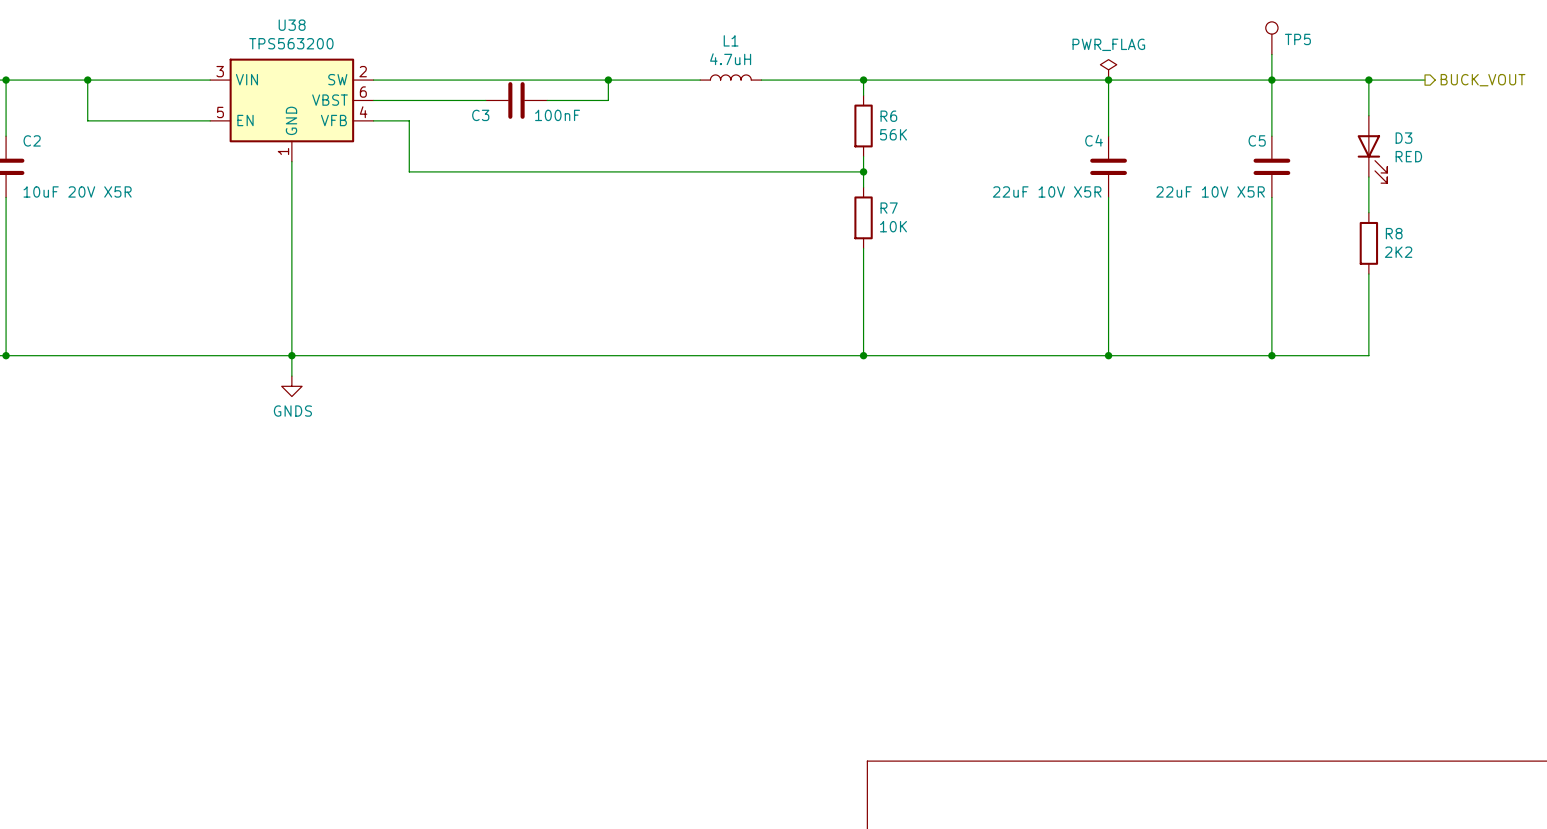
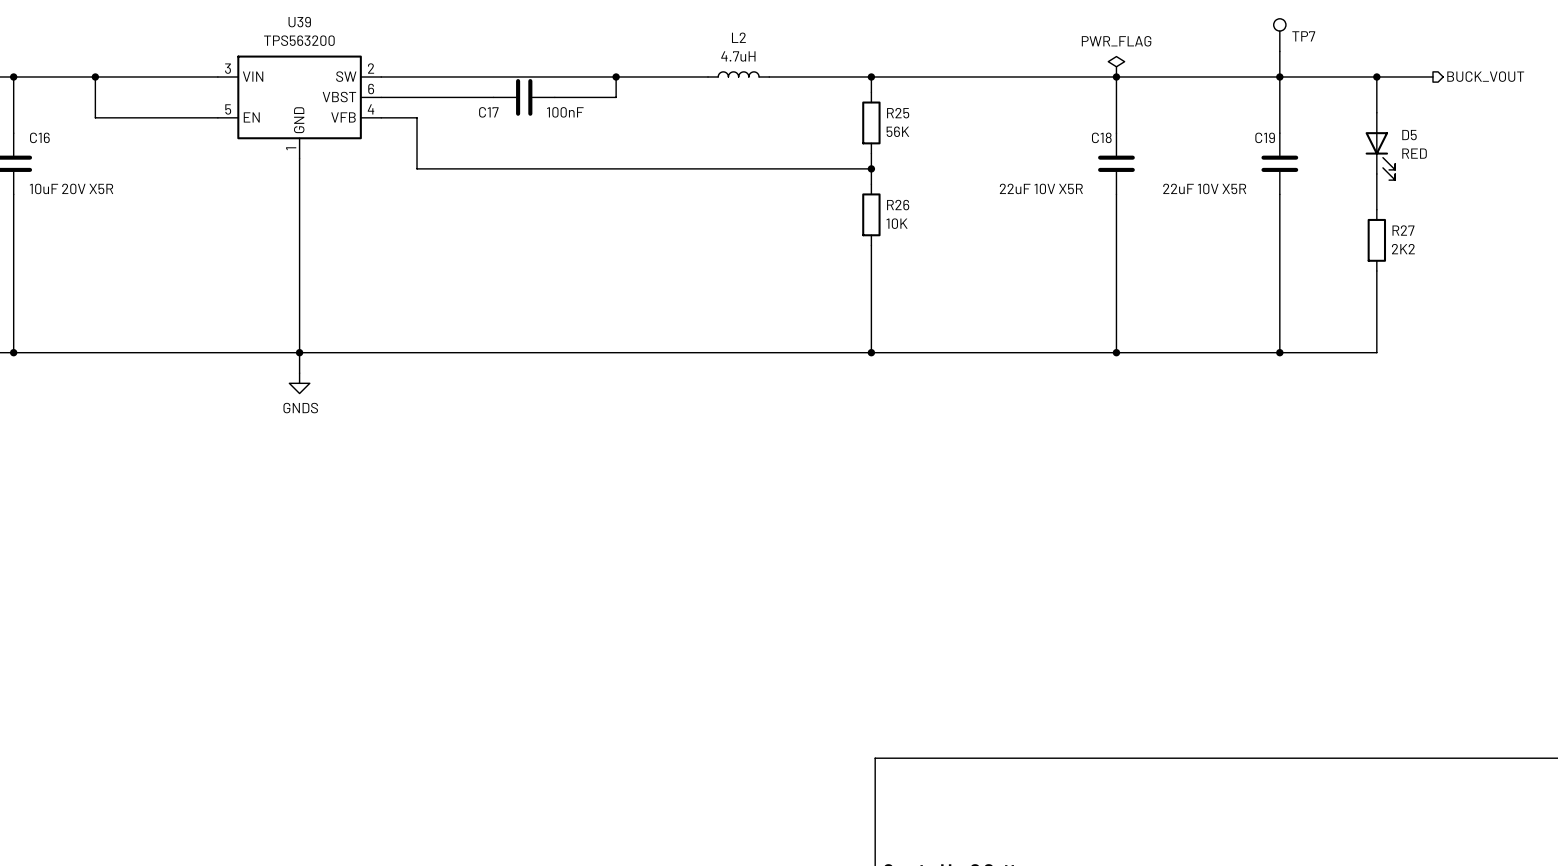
U38 name: U38 (292, 25) -> U39 (299, 22)
TP5 name: TP5 (1297, 39) -> TP7 (1303, 36)
L1 name: L1 (731, 40) -> L2 (738, 37)
C3 name: C3 (480, 115) -> C17 (488, 112)
R6 name: R6 (888, 116) -> R25 (898, 113)
D3 name: D3 (1403, 138) -> D5 (1409, 135)
C2 name: C2 (32, 140) -> C16 (39, 137)
C4 name: C4 (1094, 140) -> C18 (1101, 137)
C5 name: C5 (1257, 140) -> C19 (1265, 137)
R7 name: R7 (889, 208) -> R26 (898, 205)
R8 name: R8 (1394, 233) -> R27 (1403, 230)

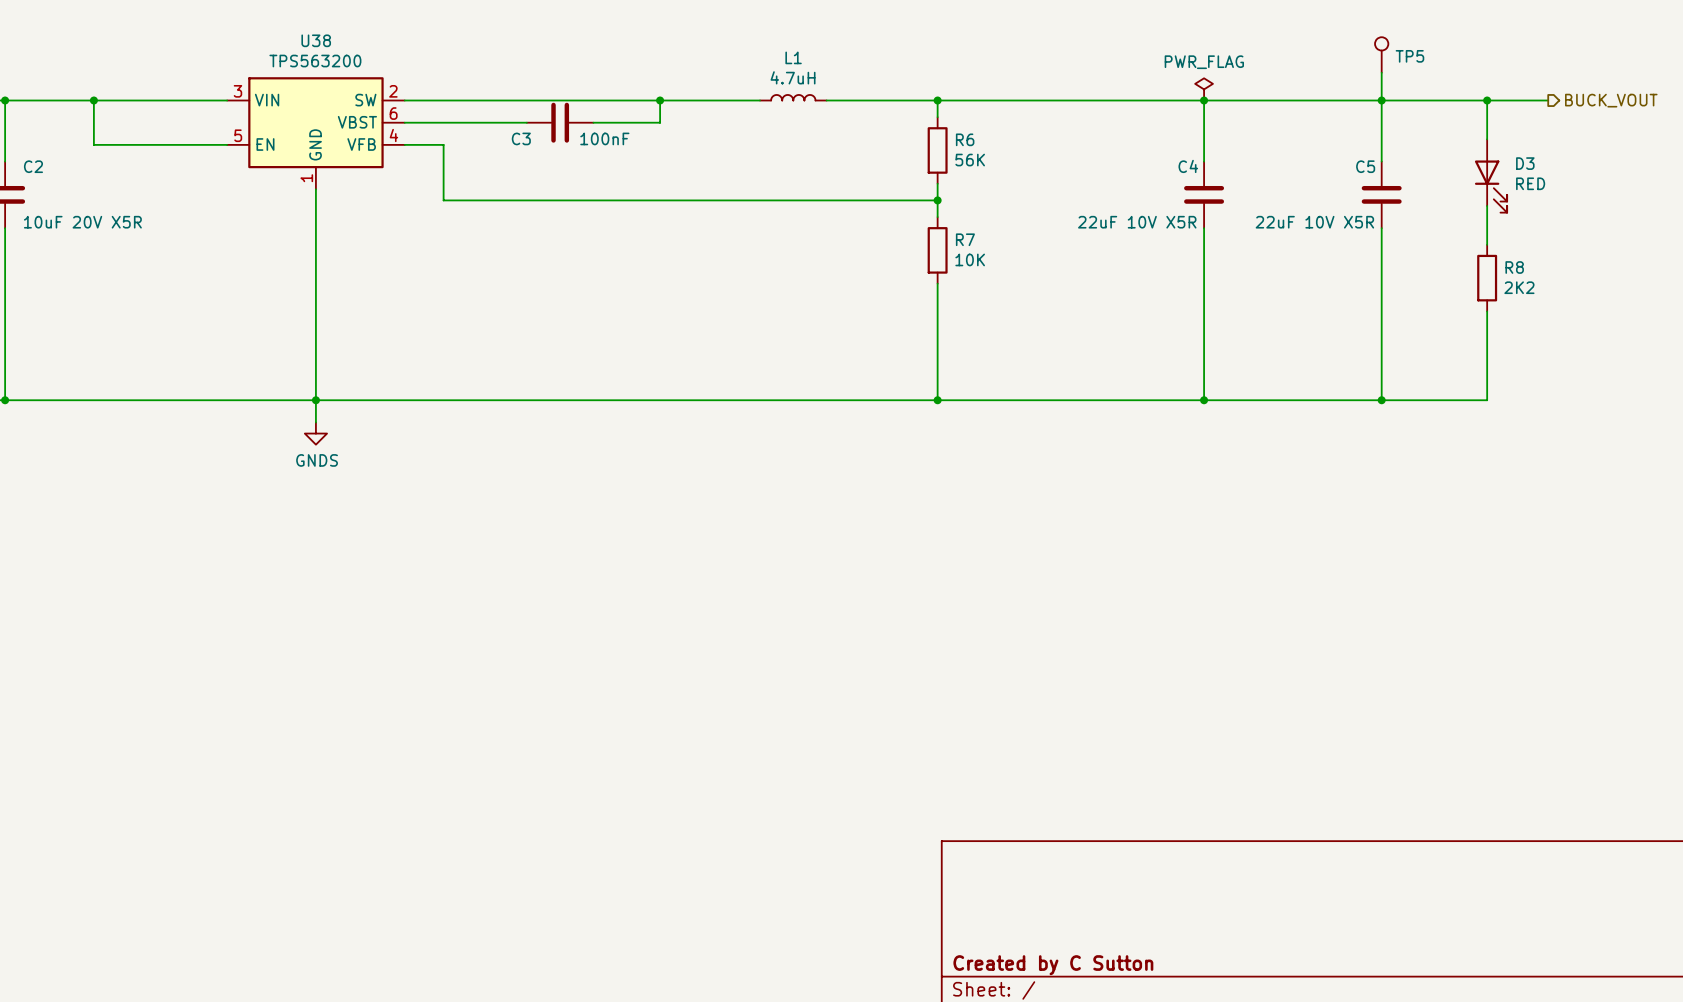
U39 name: U39 (299, 22) -> U38 (316, 40)
TP7 name: TP7 (1303, 36) -> TP5 (1409, 56)
L2 name: L2 (738, 37) -> L1 (793, 57)
C17 name: C17 (488, 112) -> C3 (521, 138)
R25 name: R25 (898, 113) -> R6 (965, 139)
D5 name: D5 (1409, 135) -> D3 (1525, 163)
C16 name: C16 (39, 137) -> C2 (33, 166)
C18 name: C18 (1101, 137) -> C4 (1188, 166)
C19 name: C19 (1265, 137) -> C5 (1365, 166)
R26 name: R26 (898, 205) -> R7 (965, 239)
R27 name: R27 (1403, 230) -> R8 (1514, 267)

